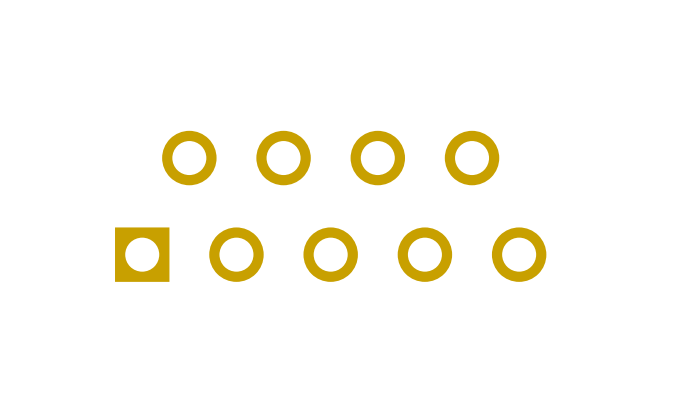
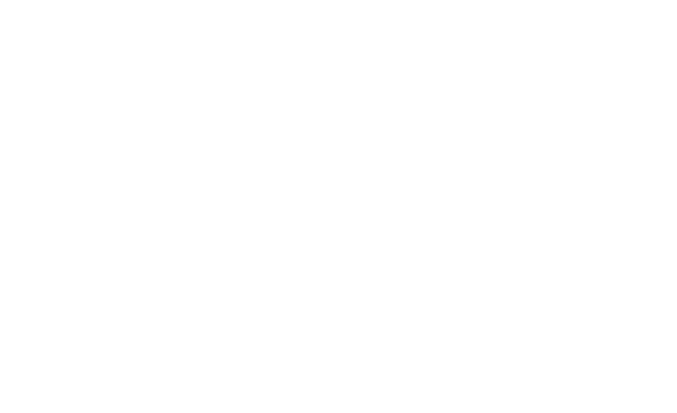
part: (330, 206) -> none

